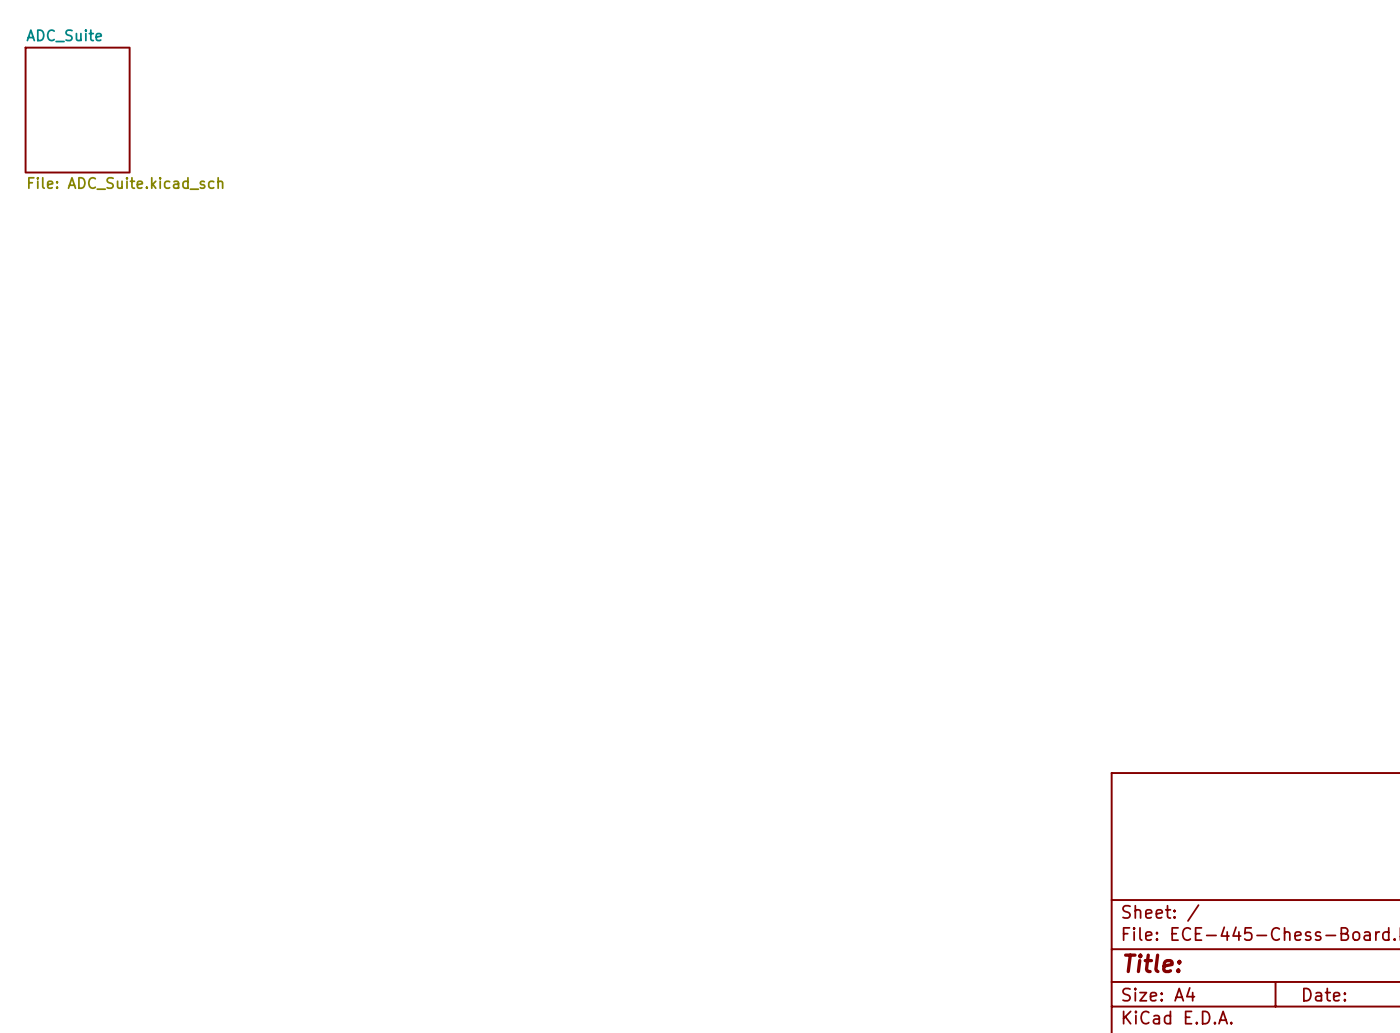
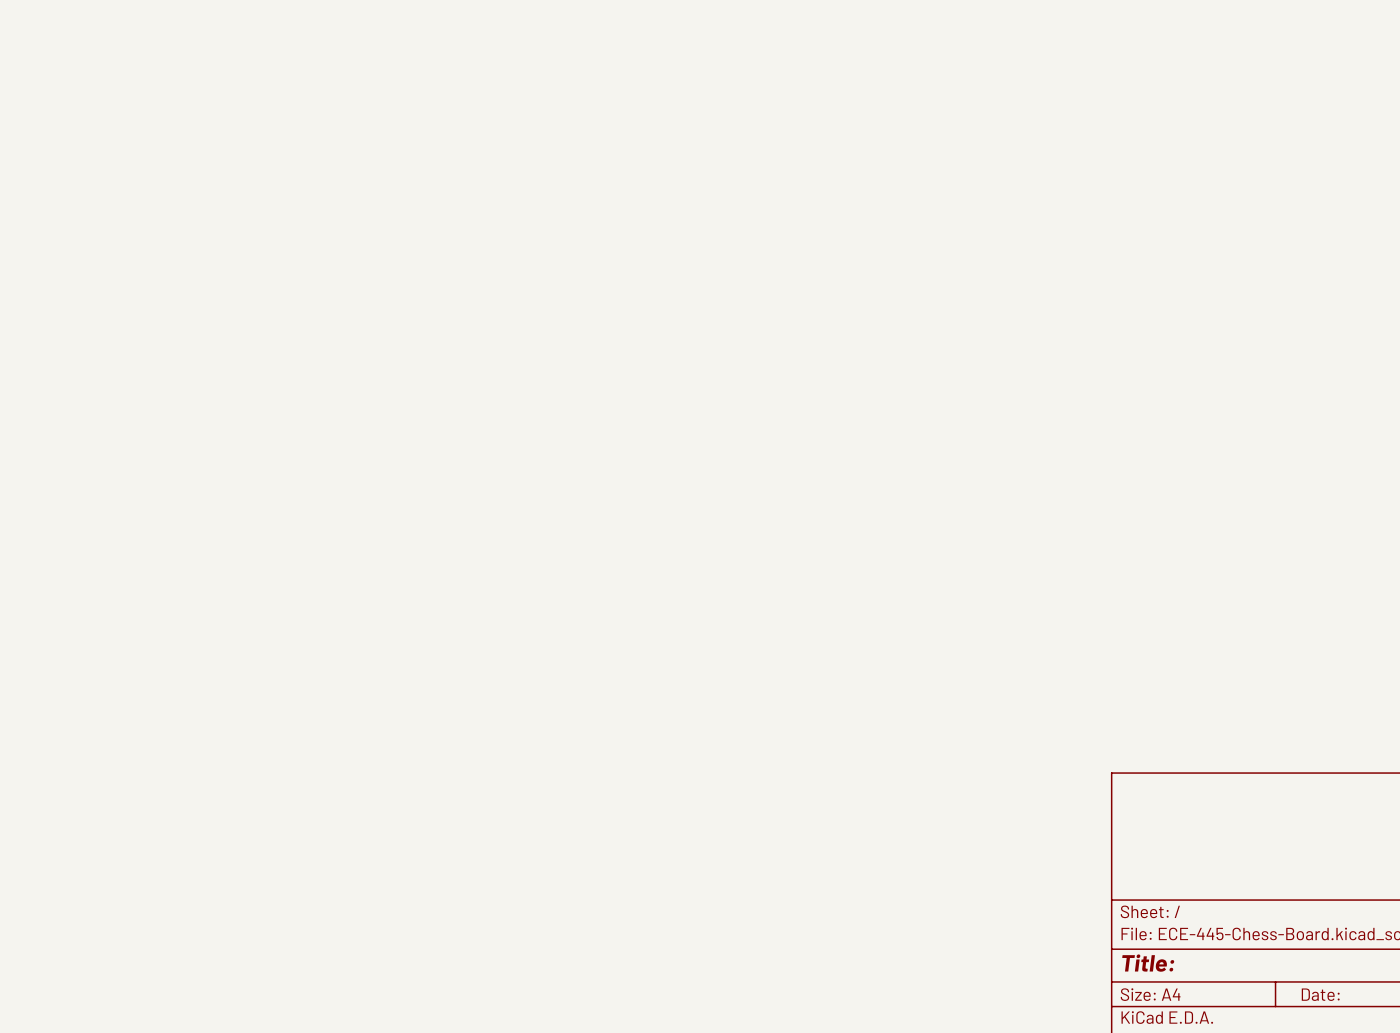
sheet ADC_Suite: File: ADC_Suite.kicad_sch (77, 110) -> none

